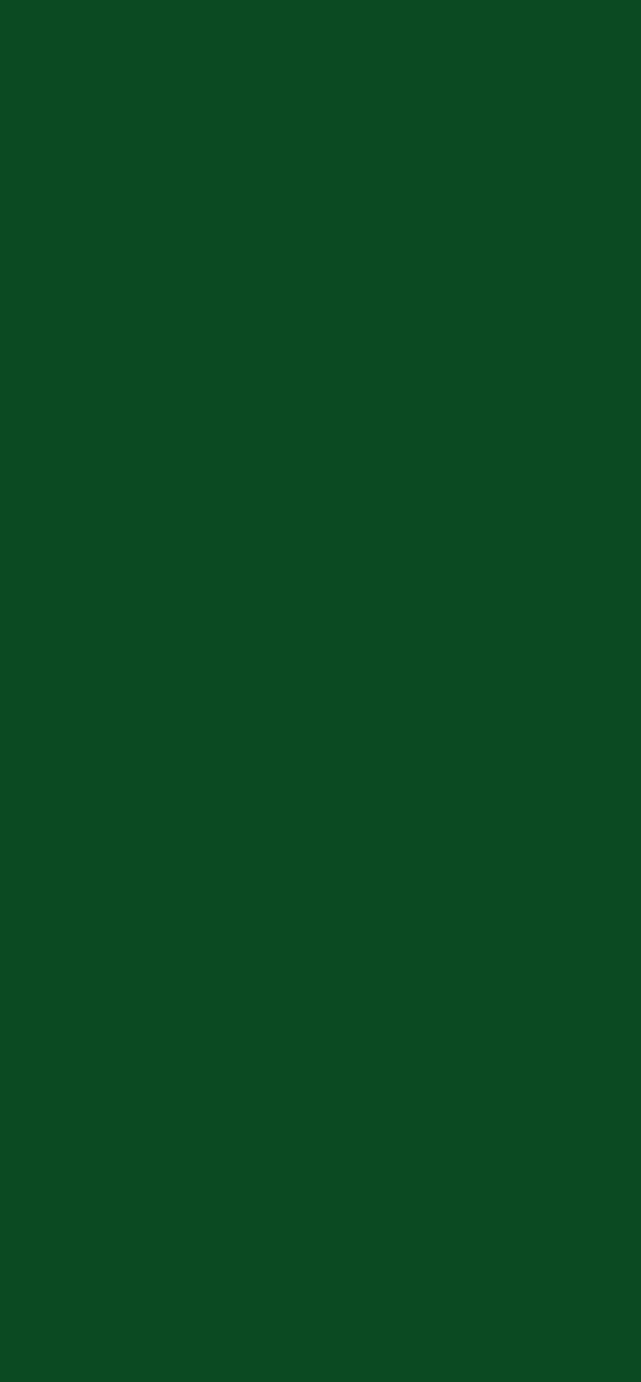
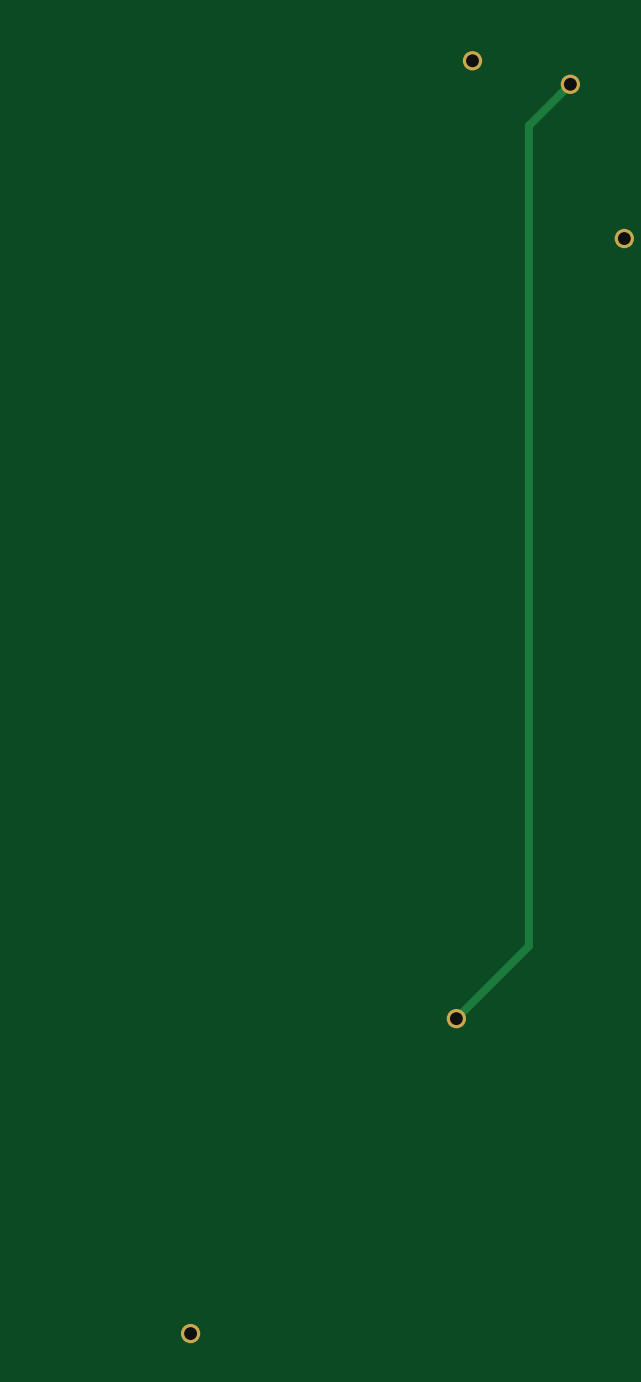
via: none -> (472, 60)
track: none -> (570, 84) (528, 125) (528, 946) (456, 1018)
via: none -> (570, 84)
via: none -> (624, 238)
via: none -> (456, 1018)
via: none -> (190, 1333)

